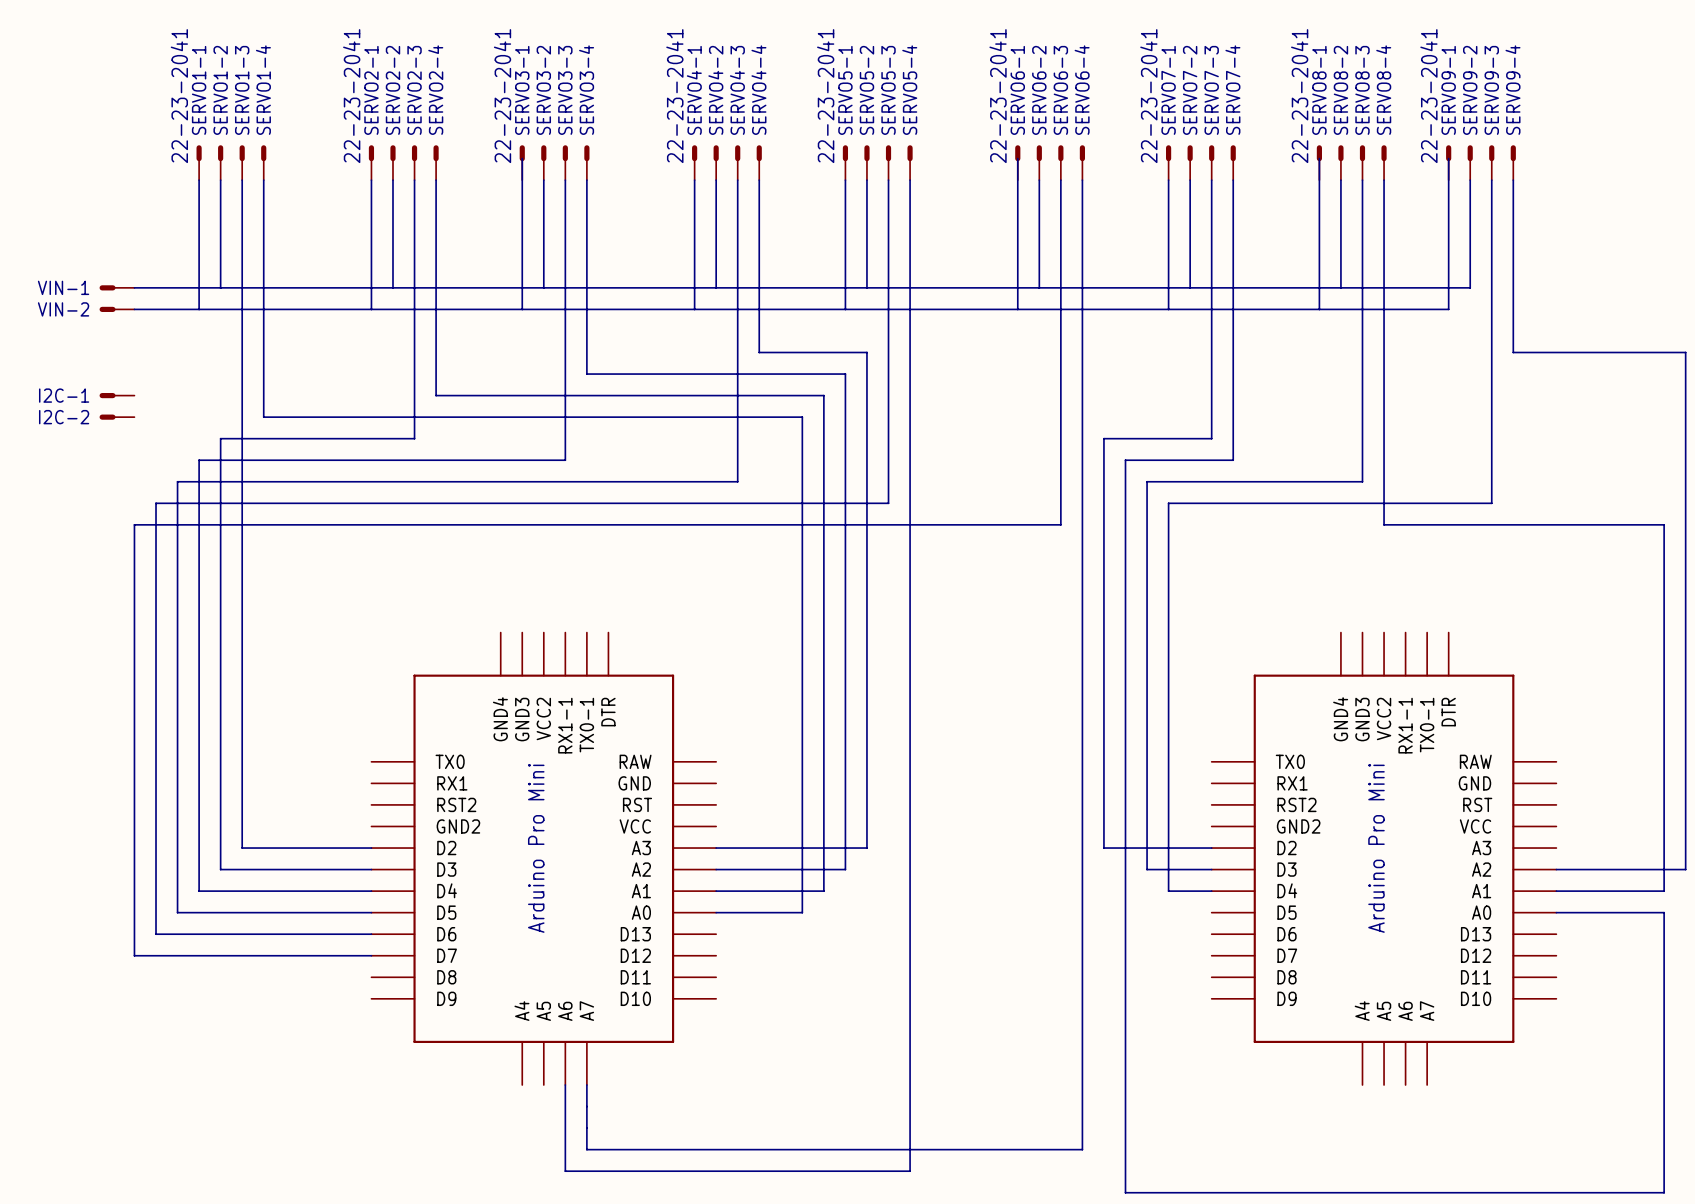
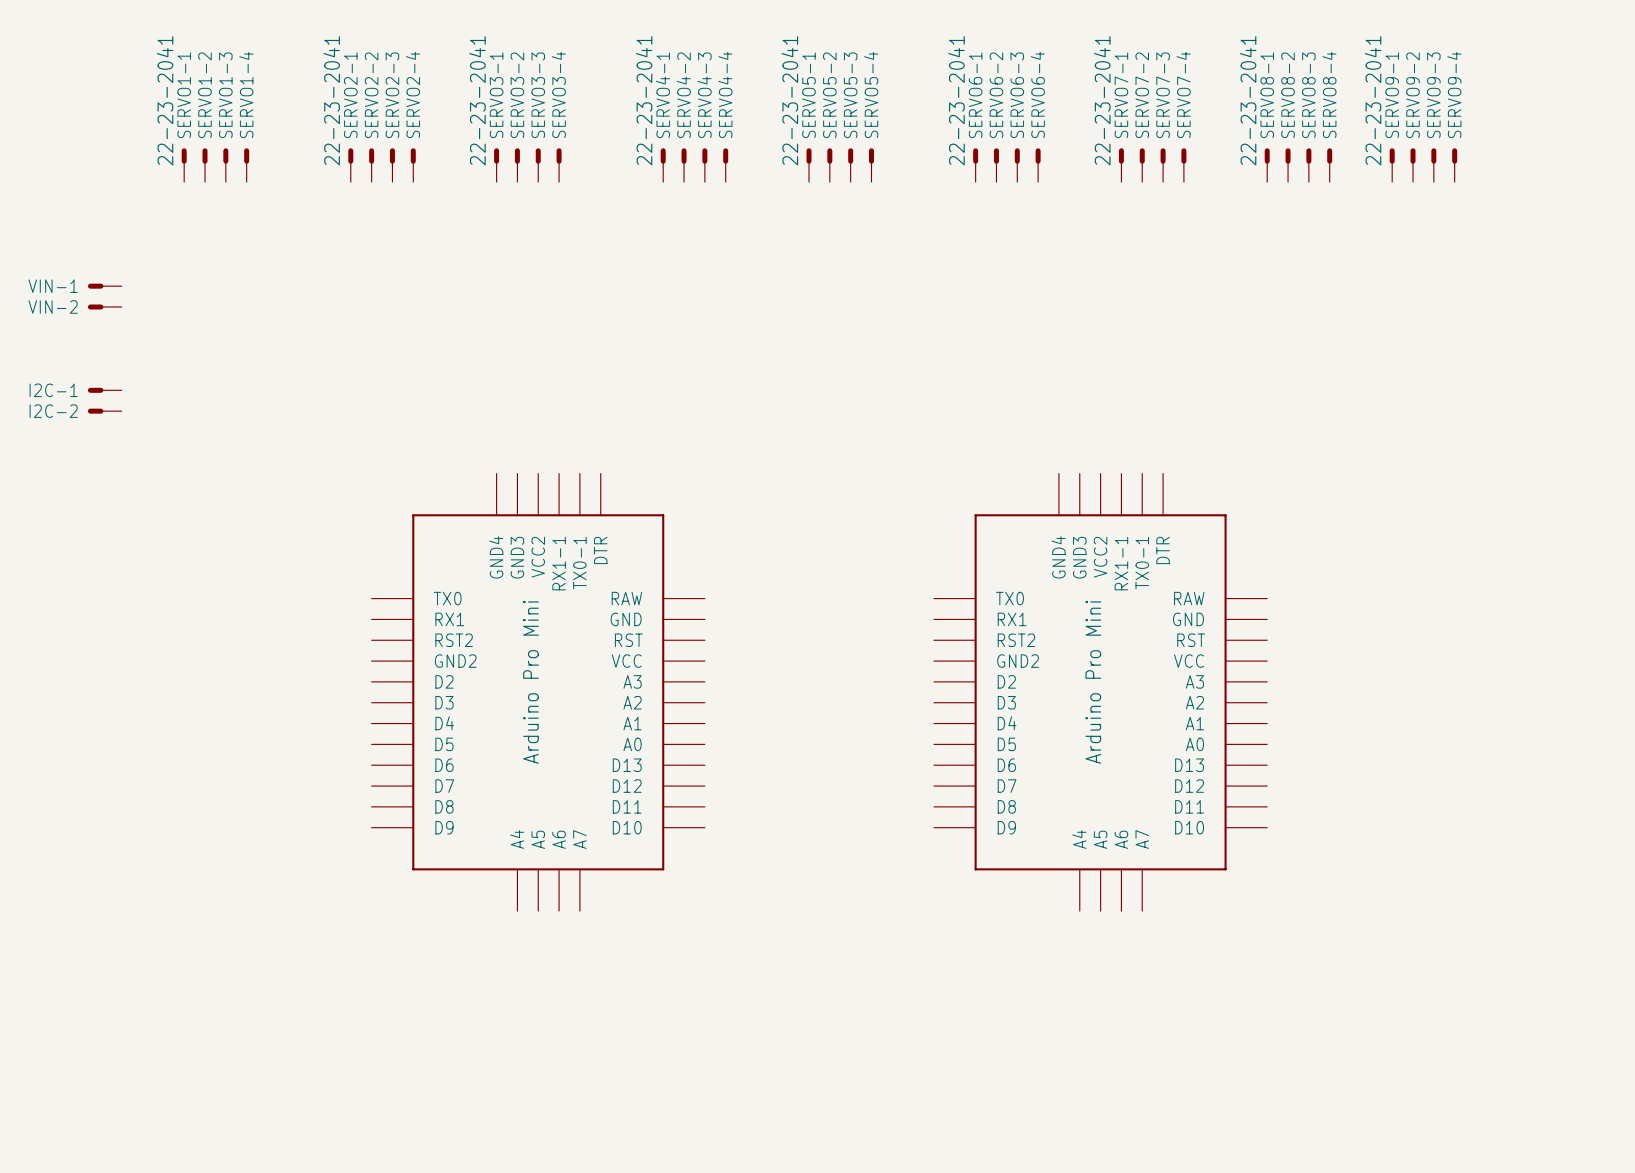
wire: (522, 158) (522, 309) -> none
wire: (1017, 158) (1017, 309) -> none
wire: (1319, 158) (1319, 309) -> none
wire: (1448, 158) (1448, 309) (134, 309) -> none
wire: (199, 180) (199, 309) -> none
wire: (220, 180) (220, 287) -> none
wire: (242, 180) (242, 848) (371, 848) -> none
wire: (263, 180) (263, 417) (802, 417) (802, 912) (716, 912) -> none
wire: (371, 180) (371, 309) -> none
wire: (392, 180) (392, 287) -> none
wire: (414, 180) (414, 438) (220, 438) (220, 869) (371, 869) -> none
wire: (436, 180) (436, 395) (823, 395) (823, 891) (716, 891) -> none
wire: (543, 180) (543, 287) -> none
wire: (565, 180) (565, 460) (199, 460) (199, 891) (371, 891) -> none
wire: (586, 180) (586, 374) (845, 374) (845, 869) (716, 869) -> none
wire: (694, 180) (694, 309) -> none
wire: (716, 180) (716, 287) -> none
wire: (737, 180) (737, 481) (177, 481) (177, 912) (371, 912) -> none
wire: (759, 180) (759, 352) (866, 352) (866, 848) (716, 848) -> none
wire: (845, 180) (845, 309) -> none
wire: (866, 180) (866, 287) -> none
wire: (888, 180) (888, 503) (156, 503) (156, 934) (371, 934) -> none
wire: (910, 180) (910, 1171) (565, 1171) (565, 1085) -> none
wire: (1039, 180) (1039, 287) -> none
wire: (1060, 180) (1060, 524) (134, 524) (134, 955) (371, 955) -> none
wire: (1082, 180) (1082, 1149) (586, 1149) (586, 1085) -> none
wire: (1168, 180) (1168, 309) -> none
wire: (1190, 180) (1190, 287) -> none
wire: (1211, 180) (1211, 438) (1103, 438) (1103, 848) (1211, 848) -> none
wire: (1233, 180) (1233, 460) (1125, 460) (1125, 1192) (1664, 1192) (1664, 912) (1556, 912) -> none
wire: (1340, 180) (1340, 287) -> none
wire: (1362, 180) (1362, 481) (1147, 481) (1147, 869) (1211, 869) -> none
wire: (1384, 180) (1384, 524) (1664, 524) (1664, 891) (1556, 891) -> none
wire: (1470, 180) (1470, 287) (134, 287) -> none
wire: (1491, 180) (1491, 503) (1168, 503) (1168, 891) (1211, 891) -> none
wire: (1513, 180) (1513, 352) (1685, 352) (1685, 869) (1556, 869) -> none
part: none -> (1100, 692)
part position: (543, 858) -> (538, 692)
part: (1384, 858) -> none

